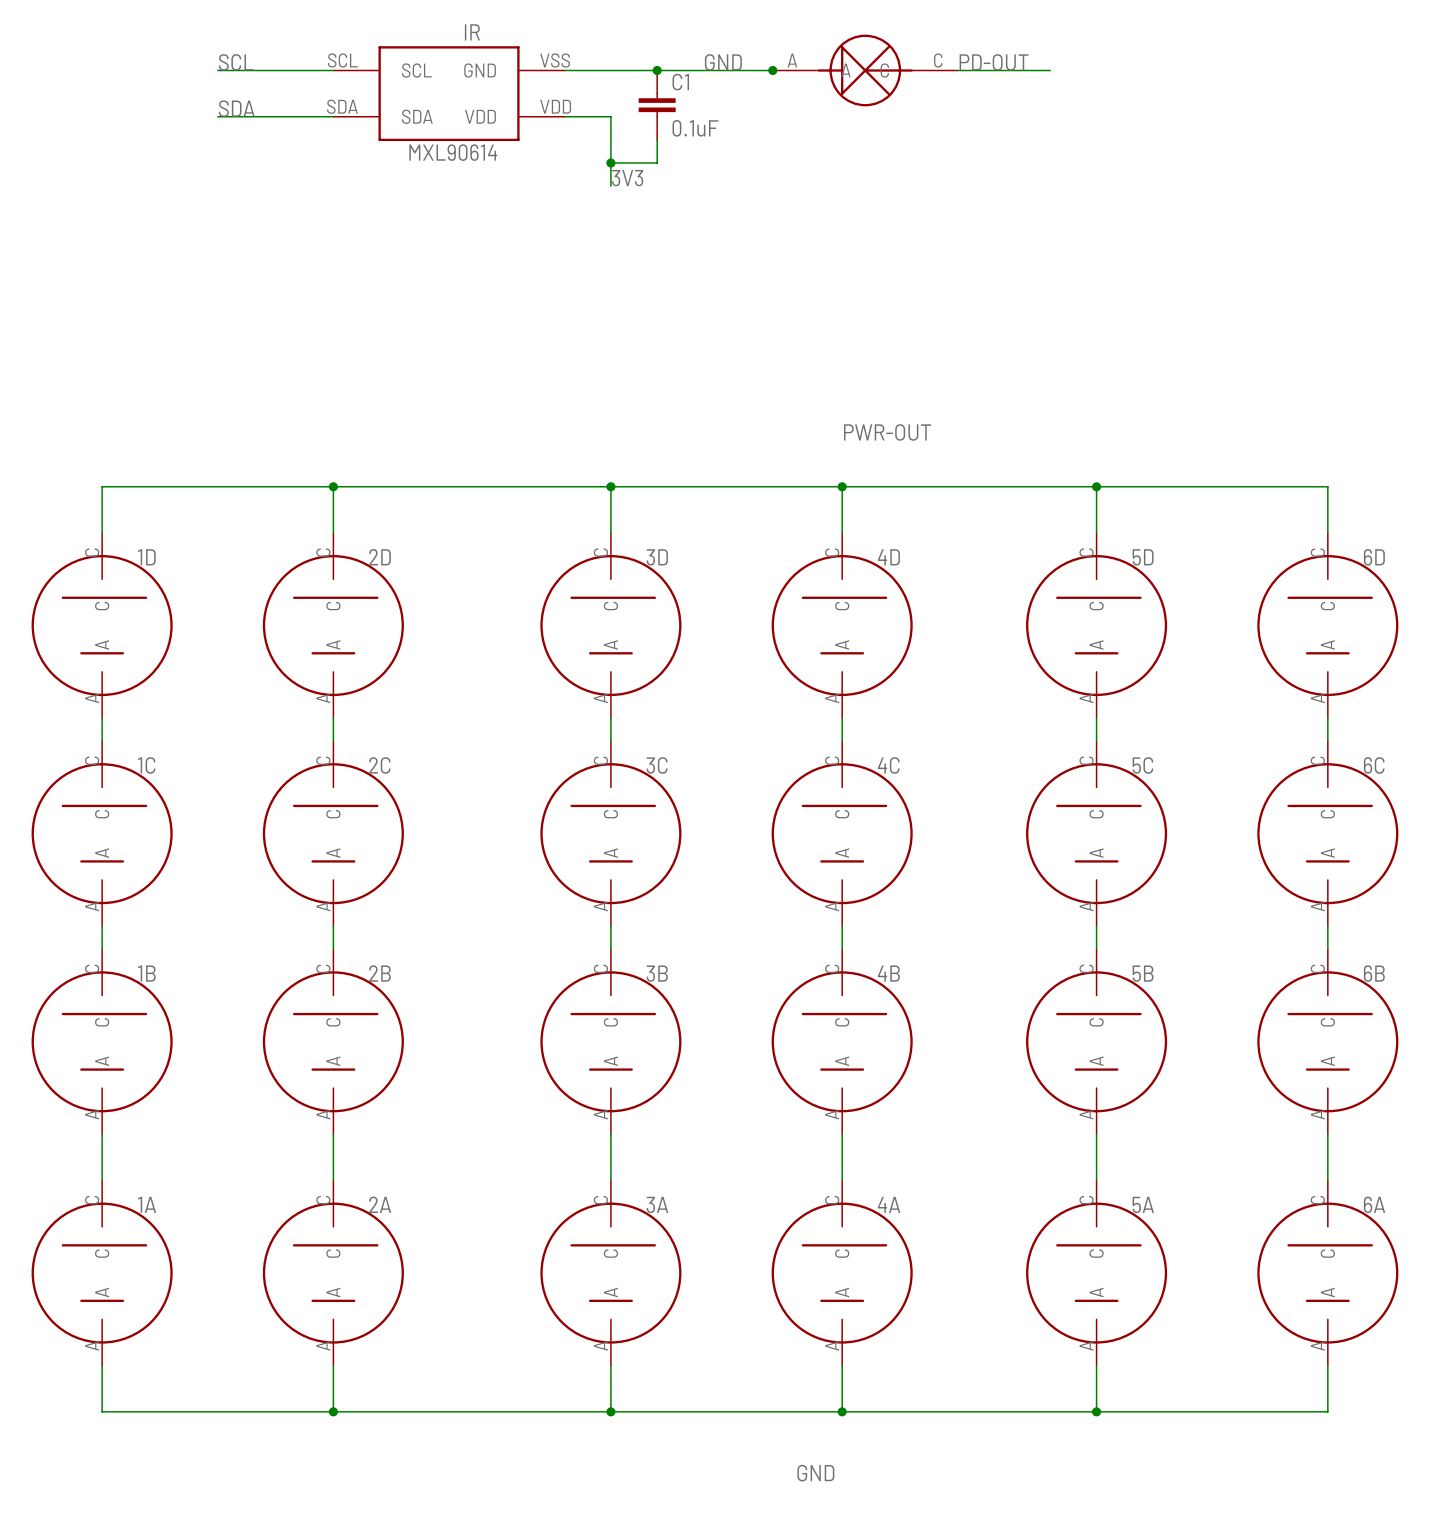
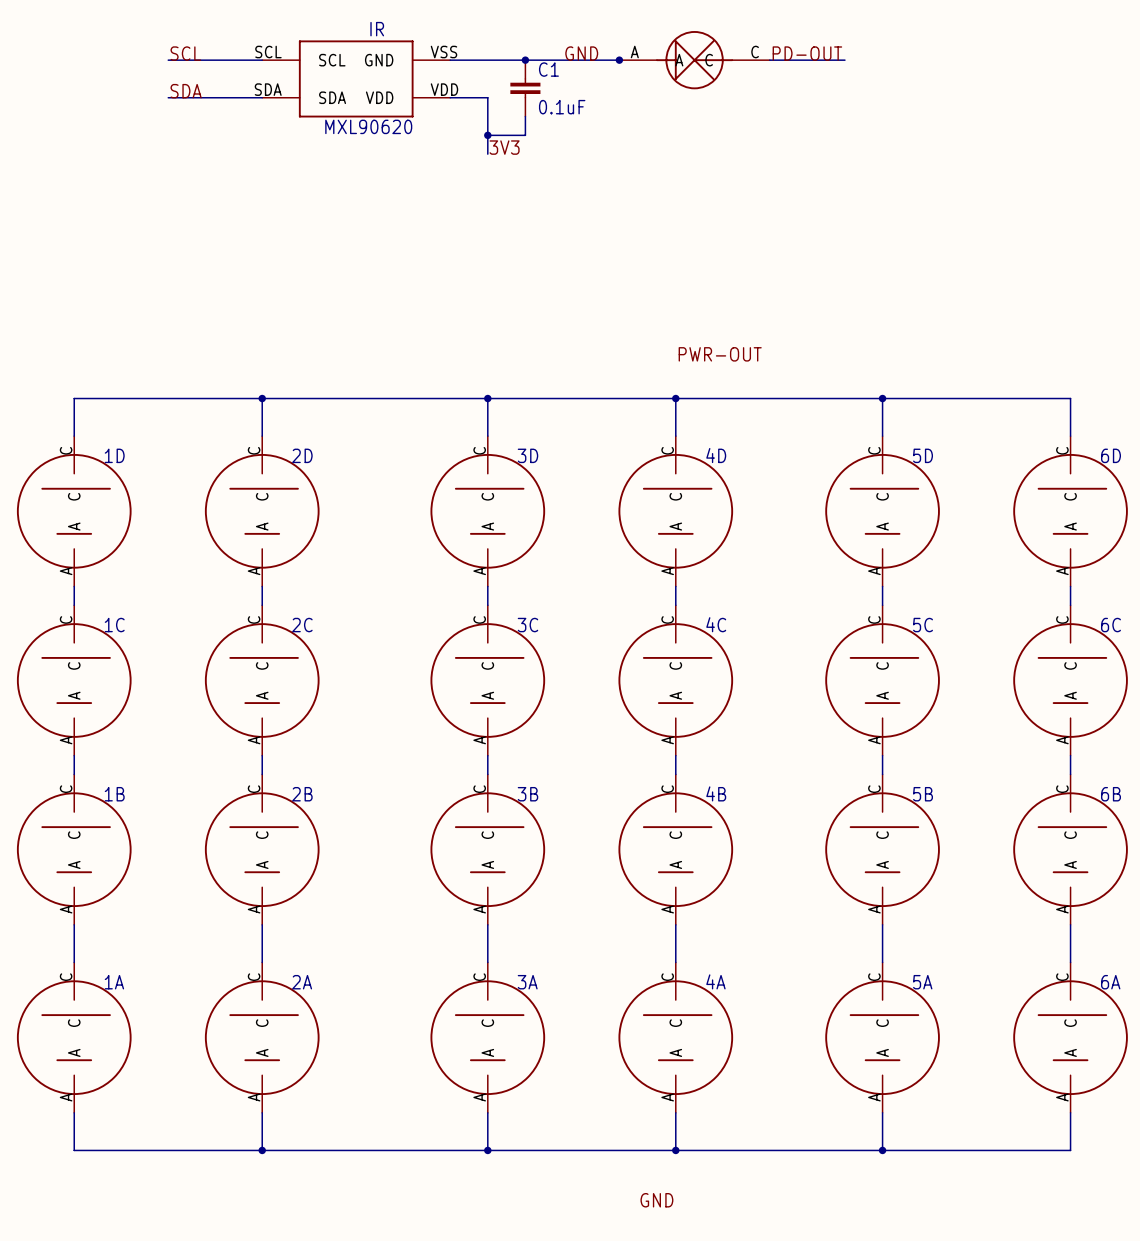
IR text: MXL90614 (453, 152) -> MXL90620 (368, 126)

